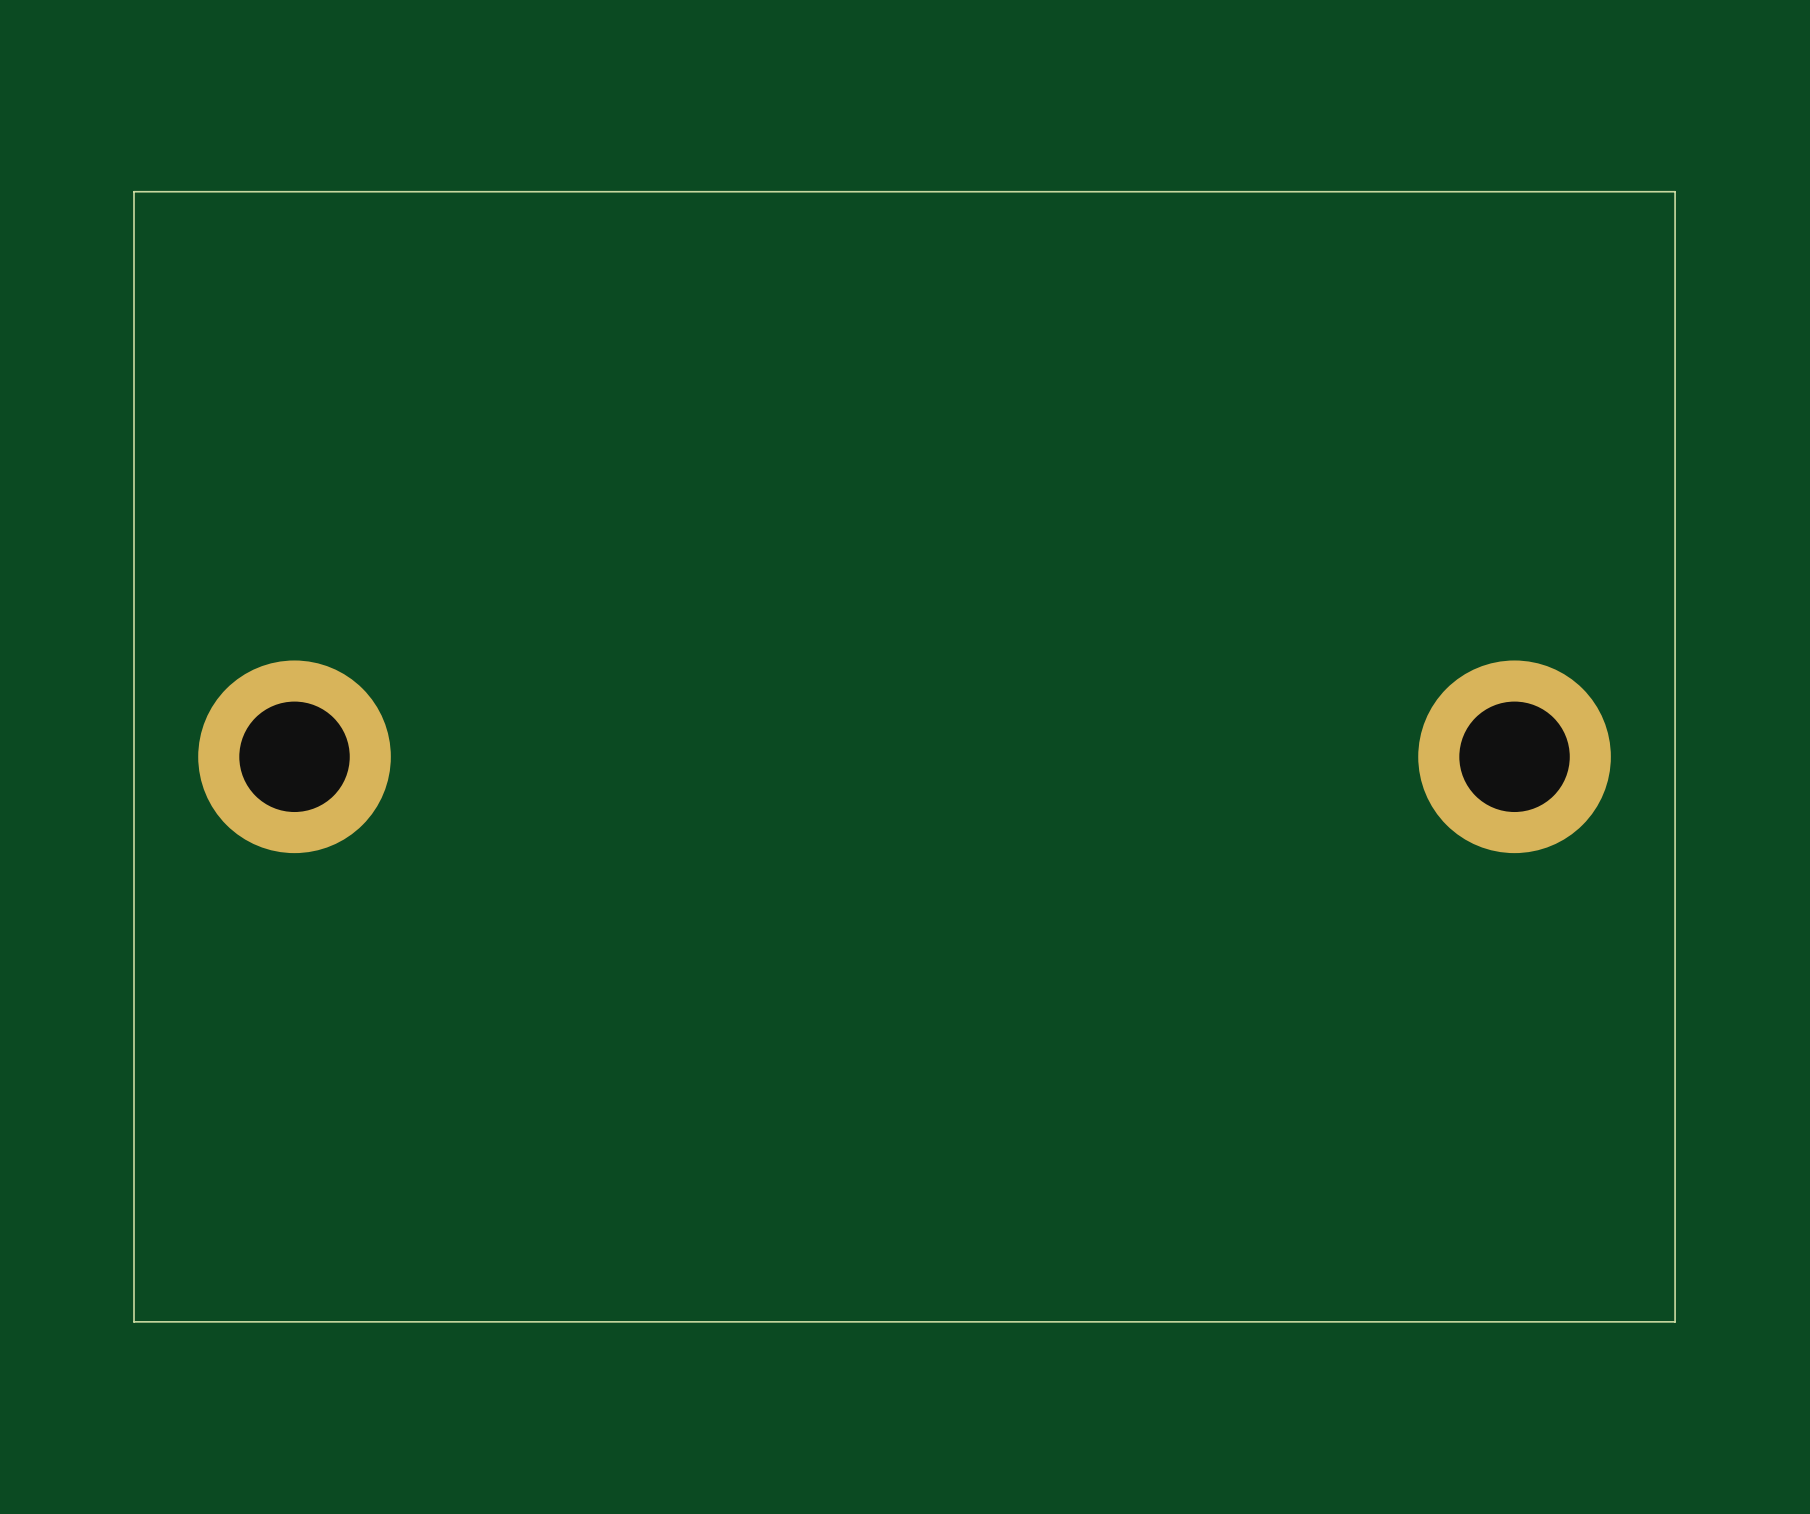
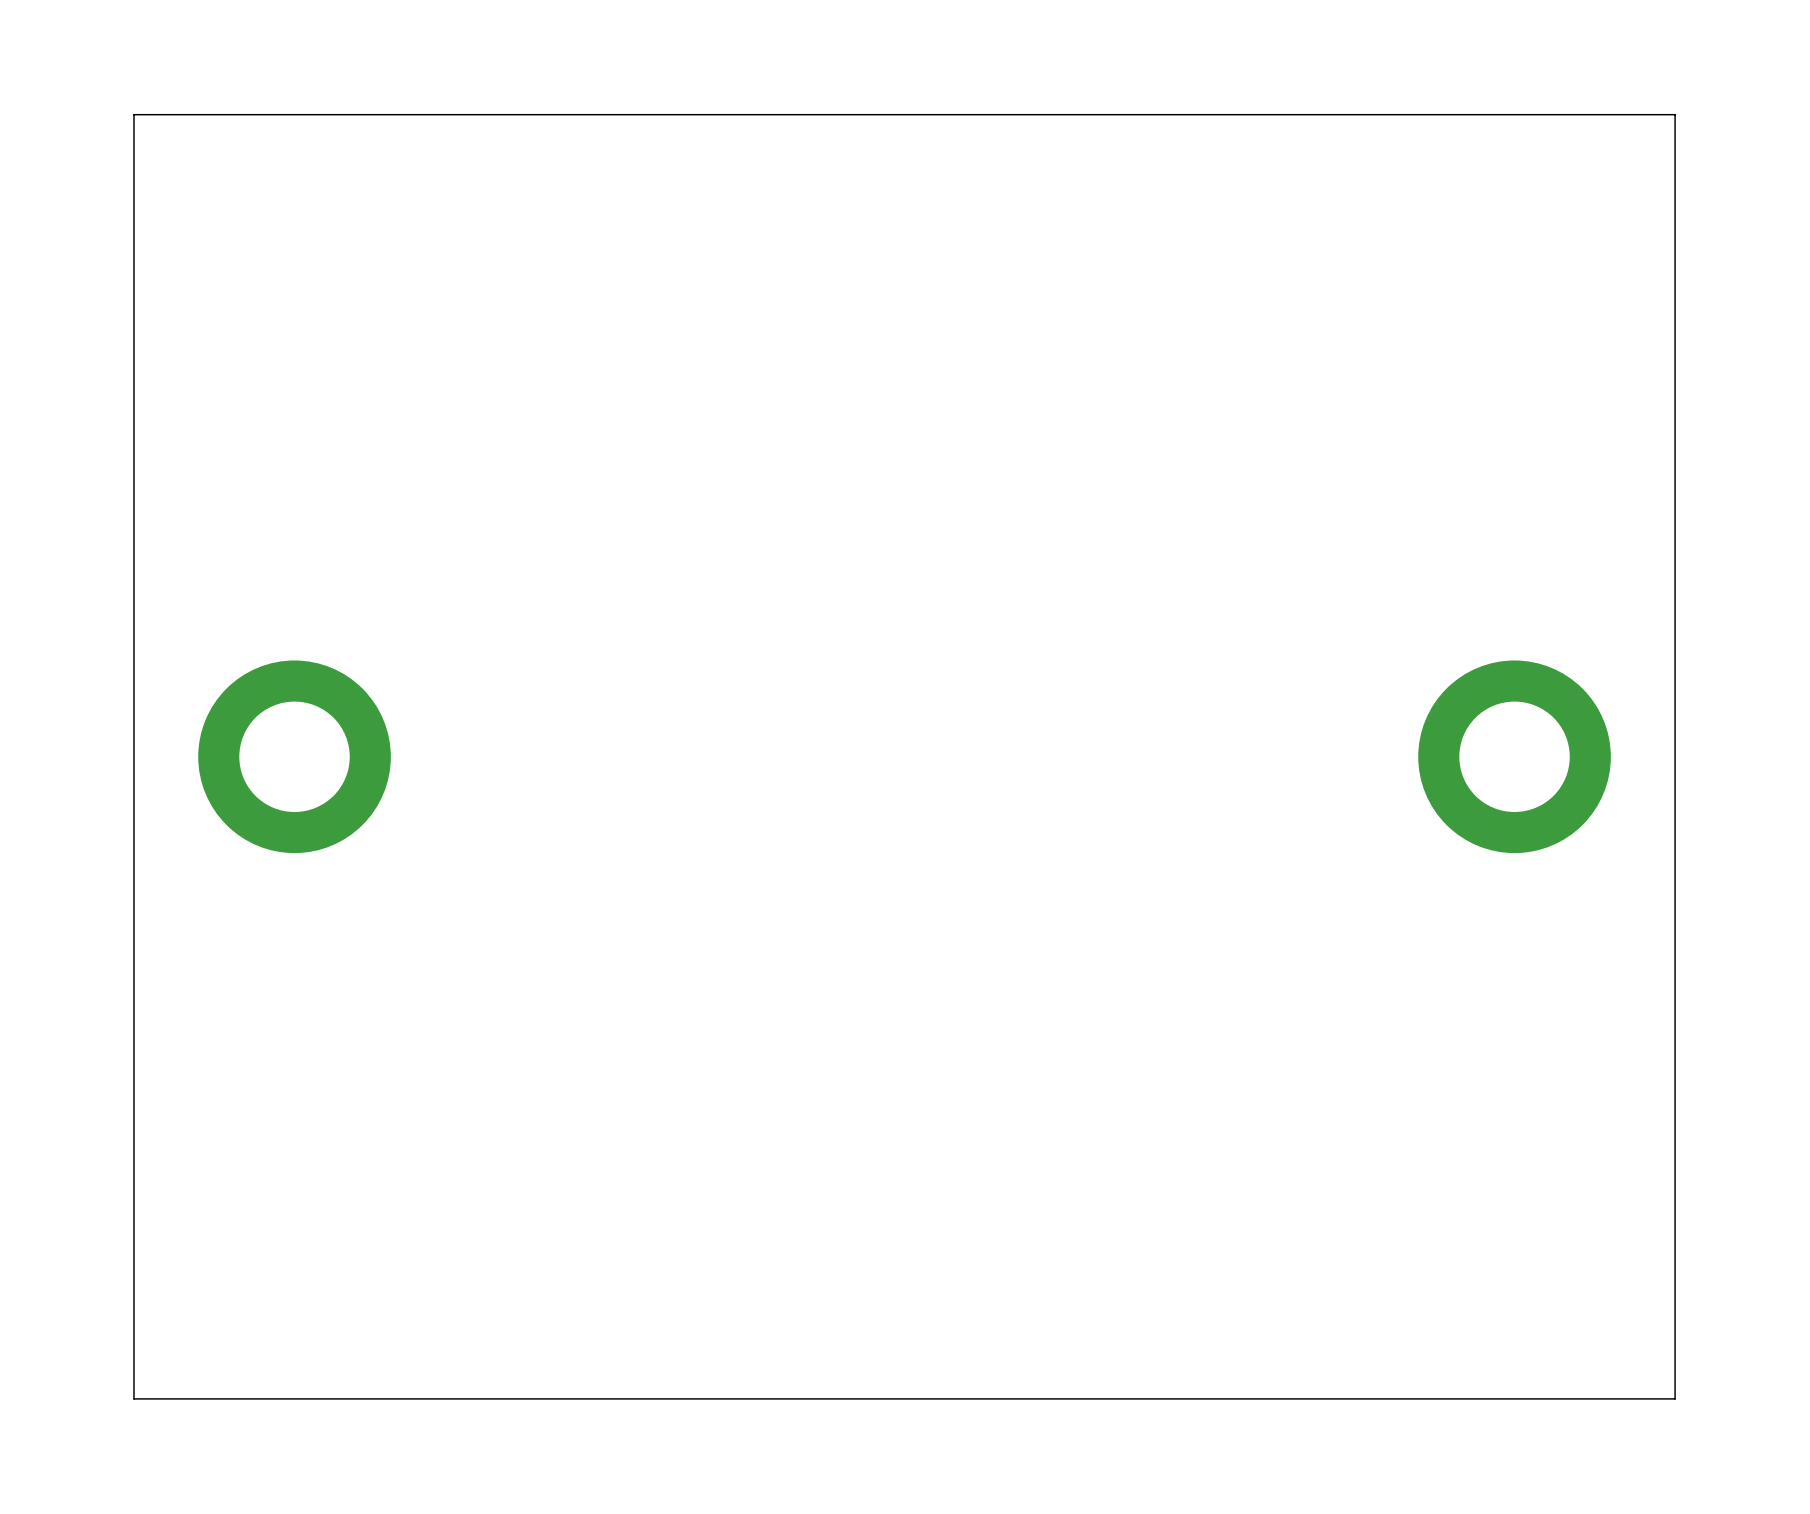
board edge: (1675, 191) (133, 191) -> (1675, 191) (1675, 114) (133, 114) (133, 191)
board edge: (1675, 1321) (133, 1321) -> (1675, 1321) (1675, 1398) (133, 1398) (133, 1321)

